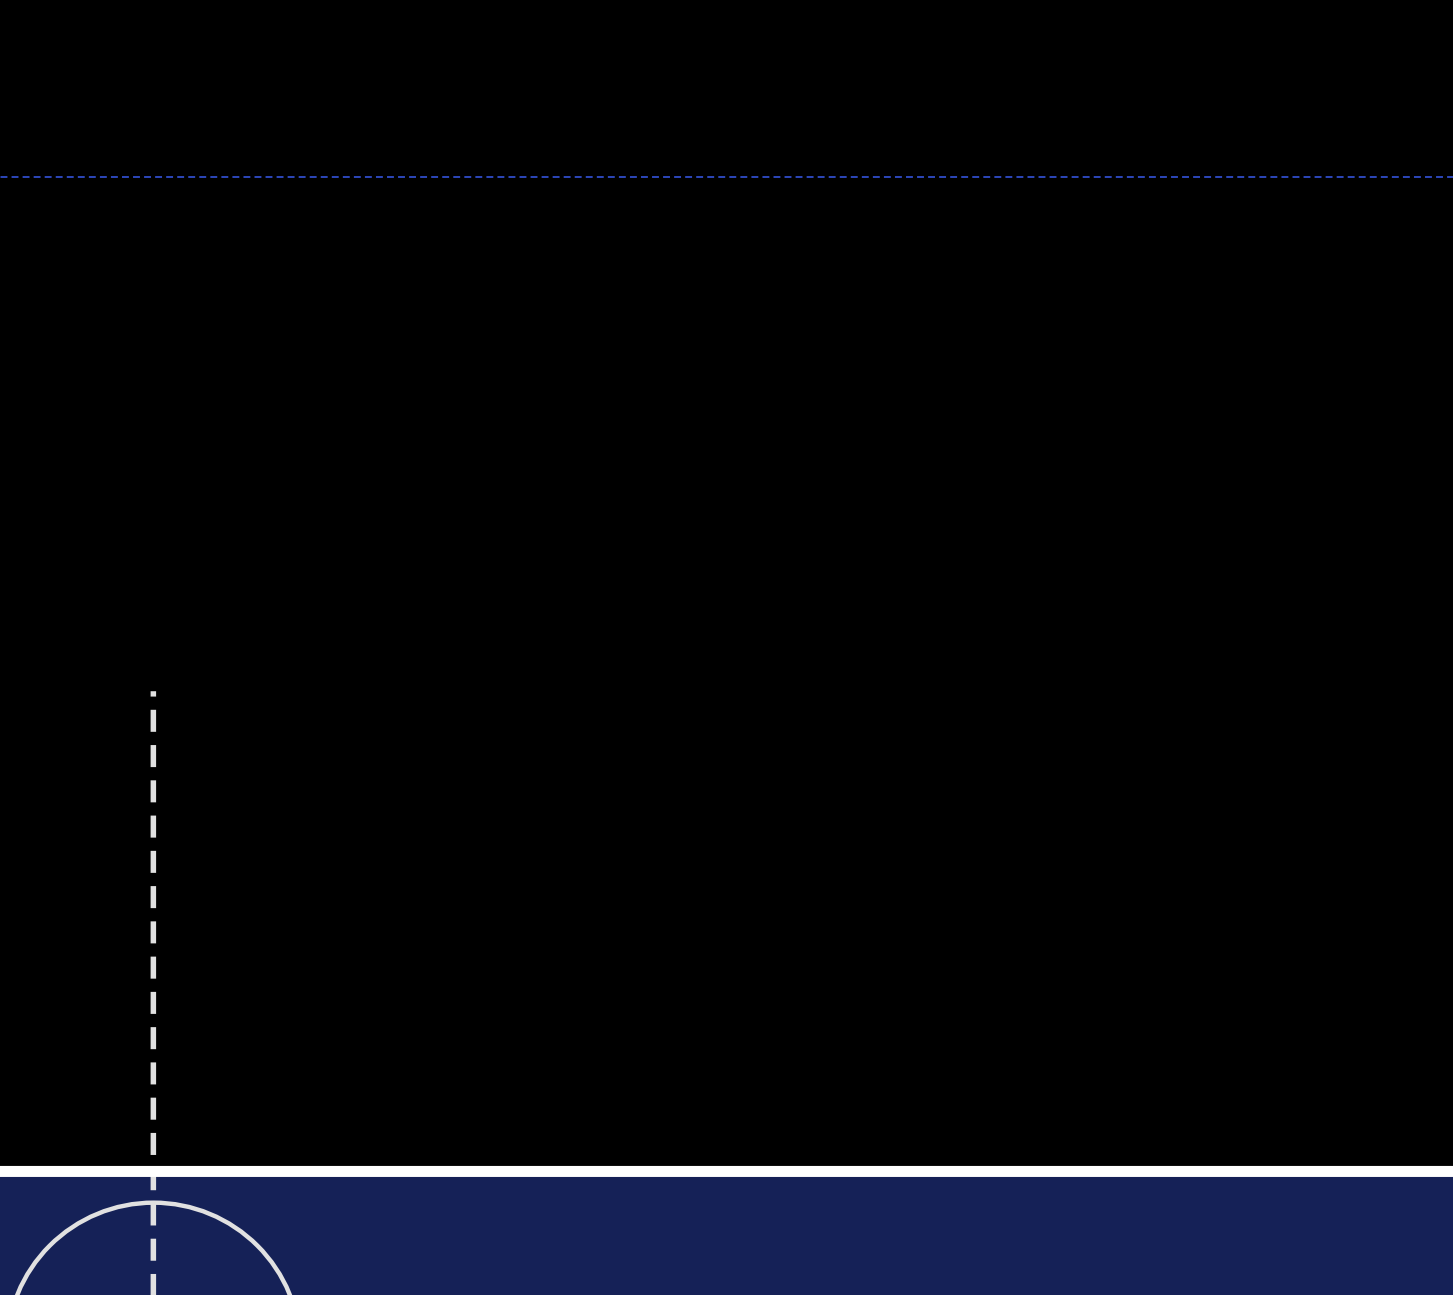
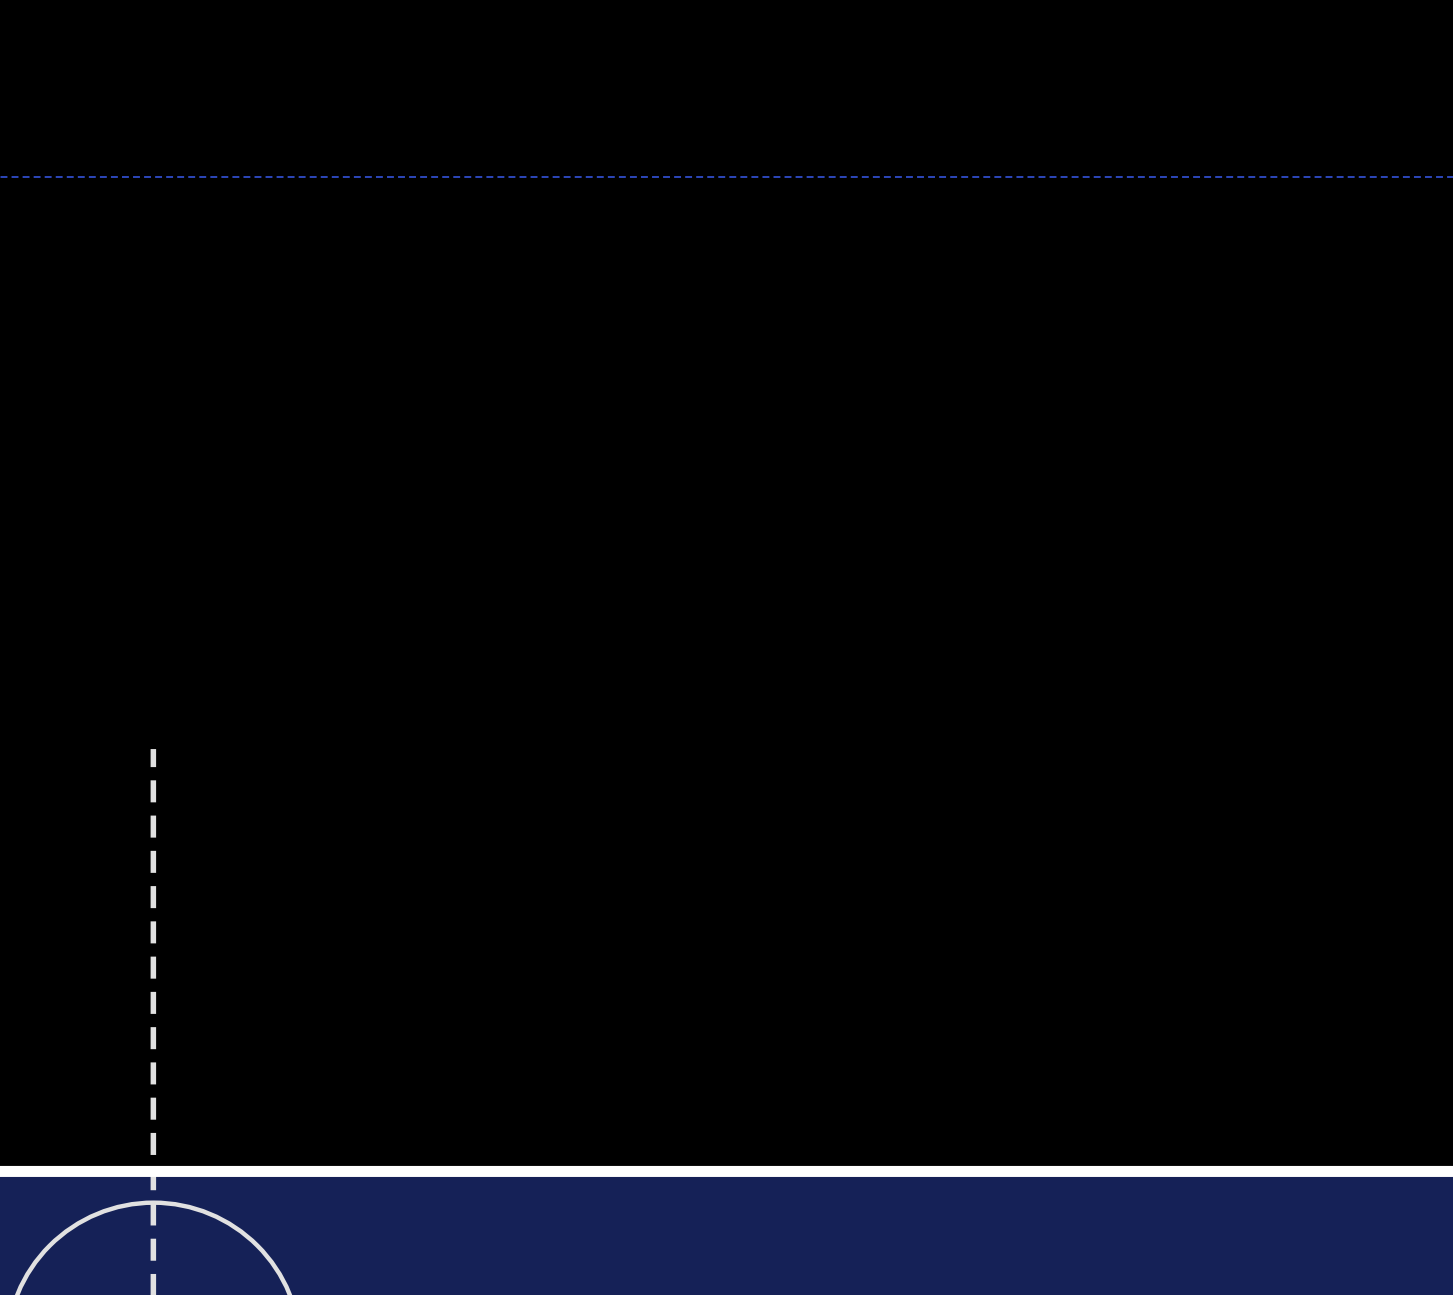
line: (153, 691) (153, 749) -> none

